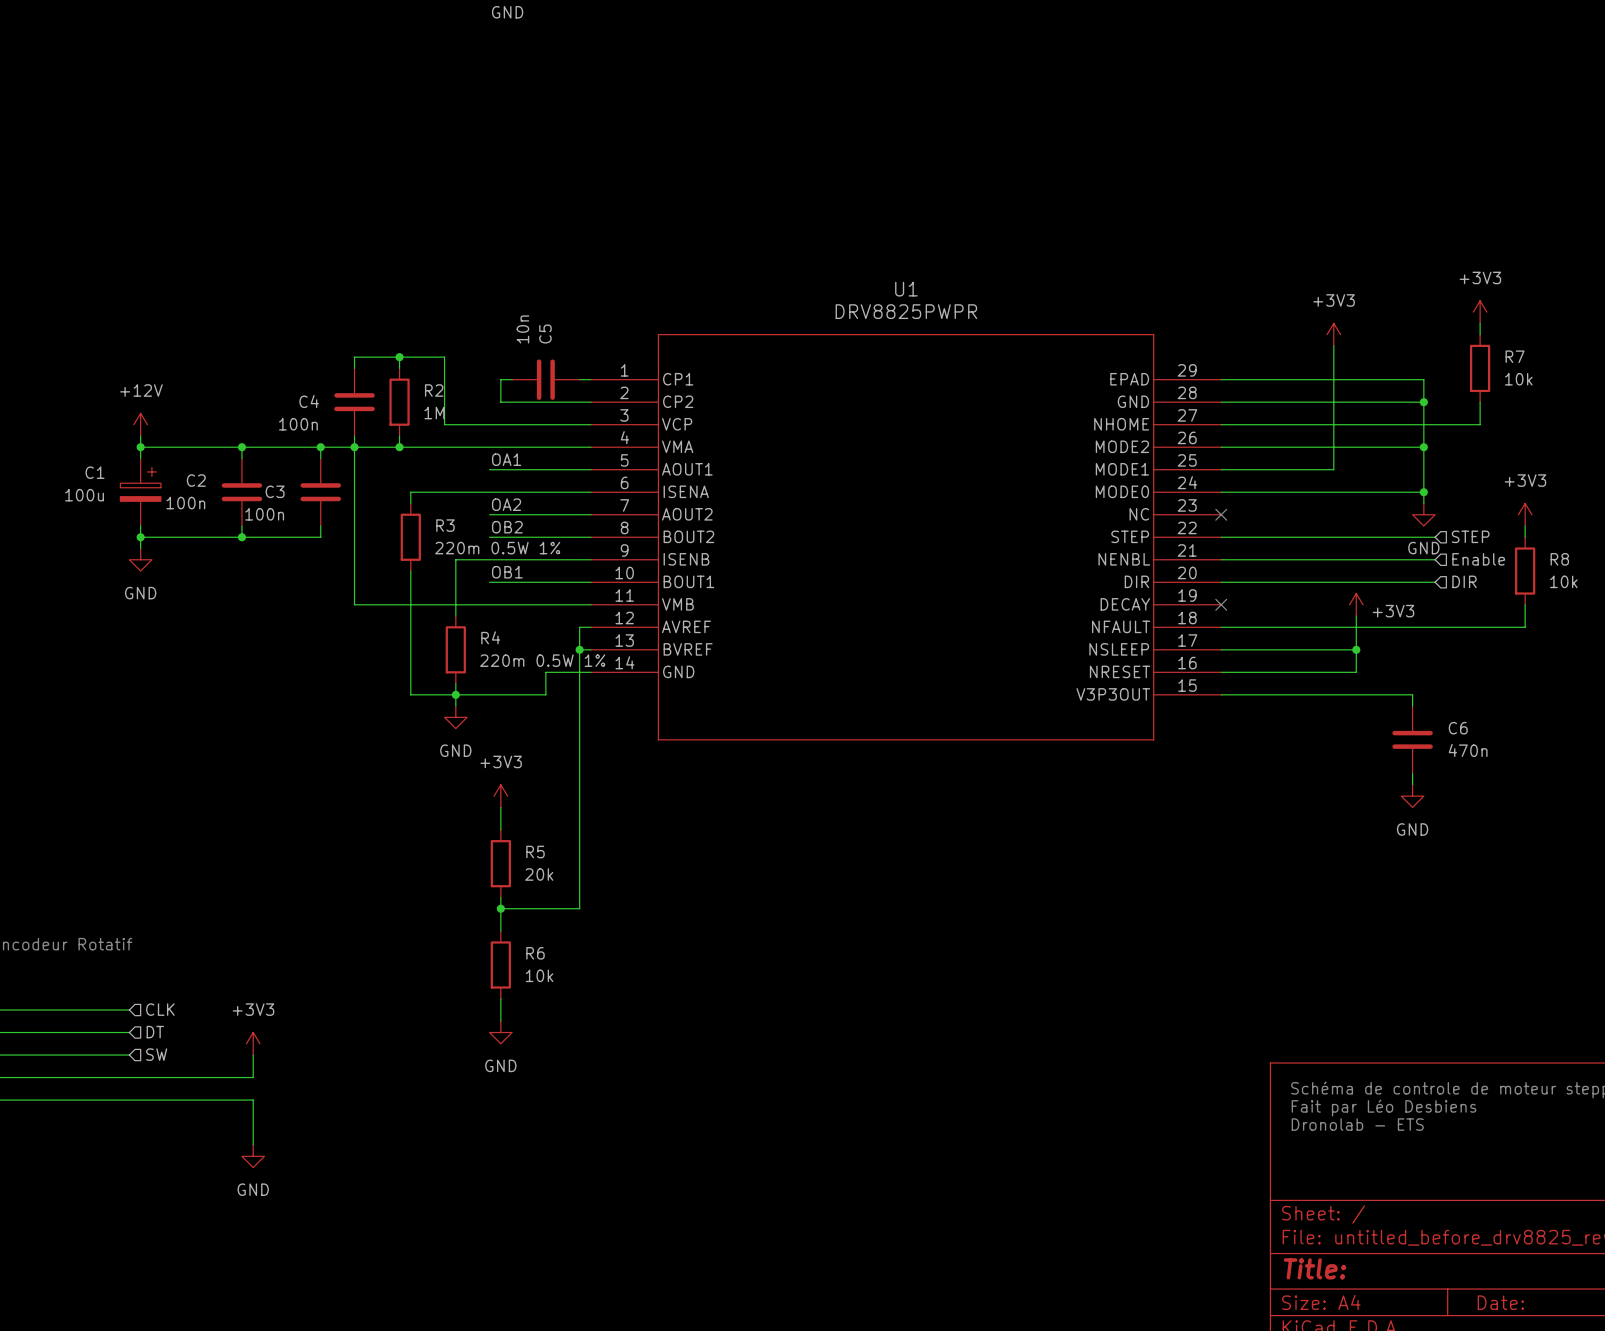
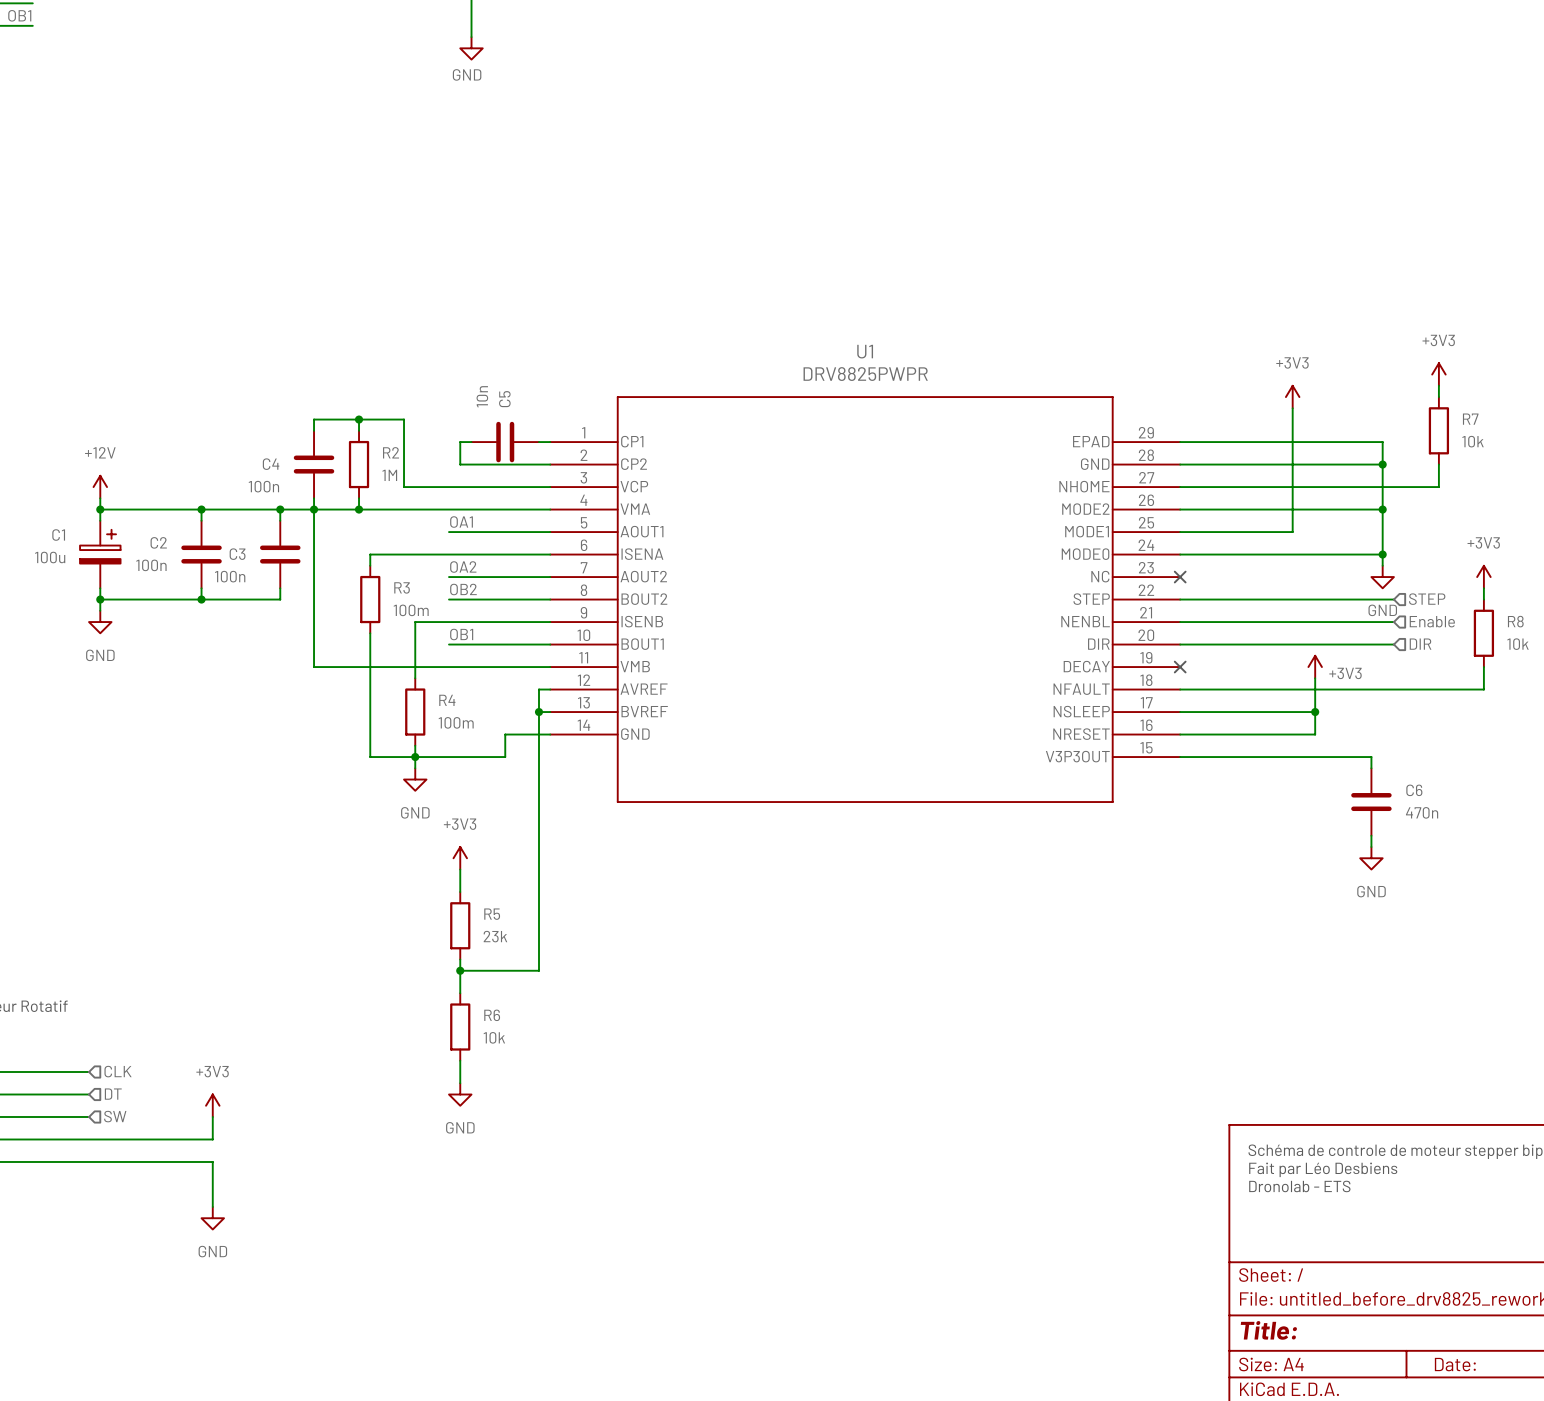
R3 value: 220m 0.5W 1% (497, 548) -> 100m (411, 610)
R4 value: 220m 0.5W 1% (542, 660) -> 100m (456, 722)
R5 value: 20k (539, 874) -> 23k (495, 936)

